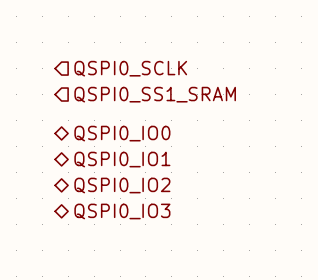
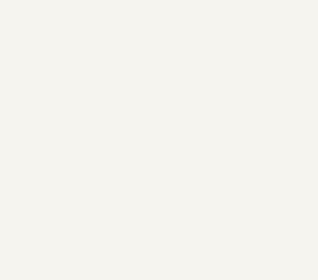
hierarchical label: QSPI0_SCLK (130, 68) -> none
hierarchical label: QSPI0_SS1_SRAM (155, 94) -> none
hierarchical label: QSPI0_IO0 (122, 133) -> none
hierarchical label: QSPI0_IO1 (122, 159) -> none
hierarchical label: QSPI0_IO2 (122, 185) -> none
hierarchical label: QSPI0_IO3 (122, 211) -> none

